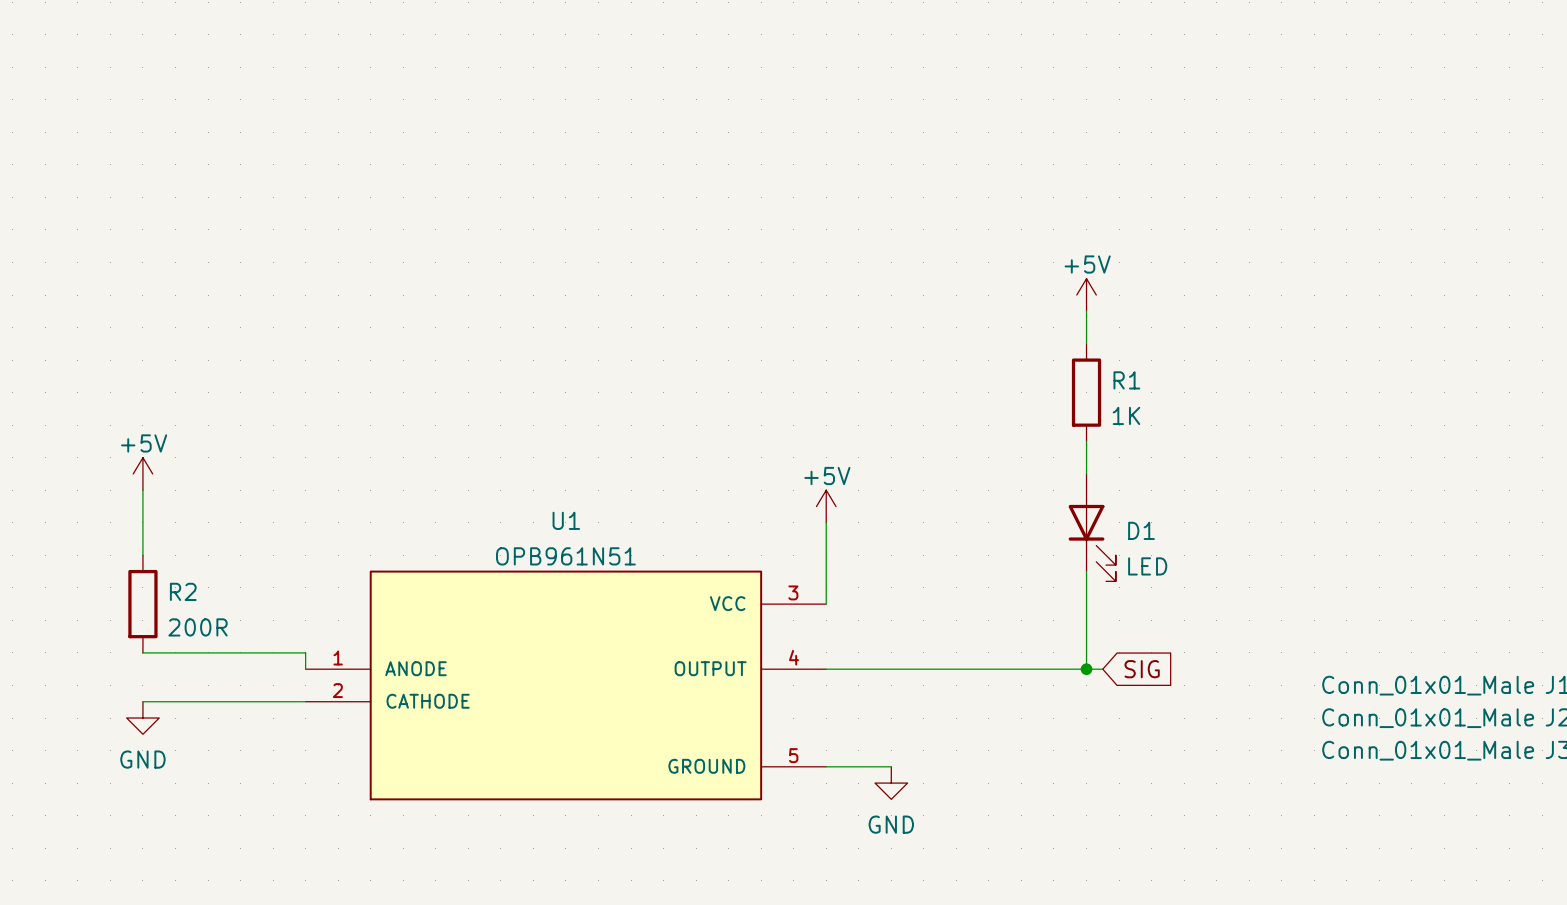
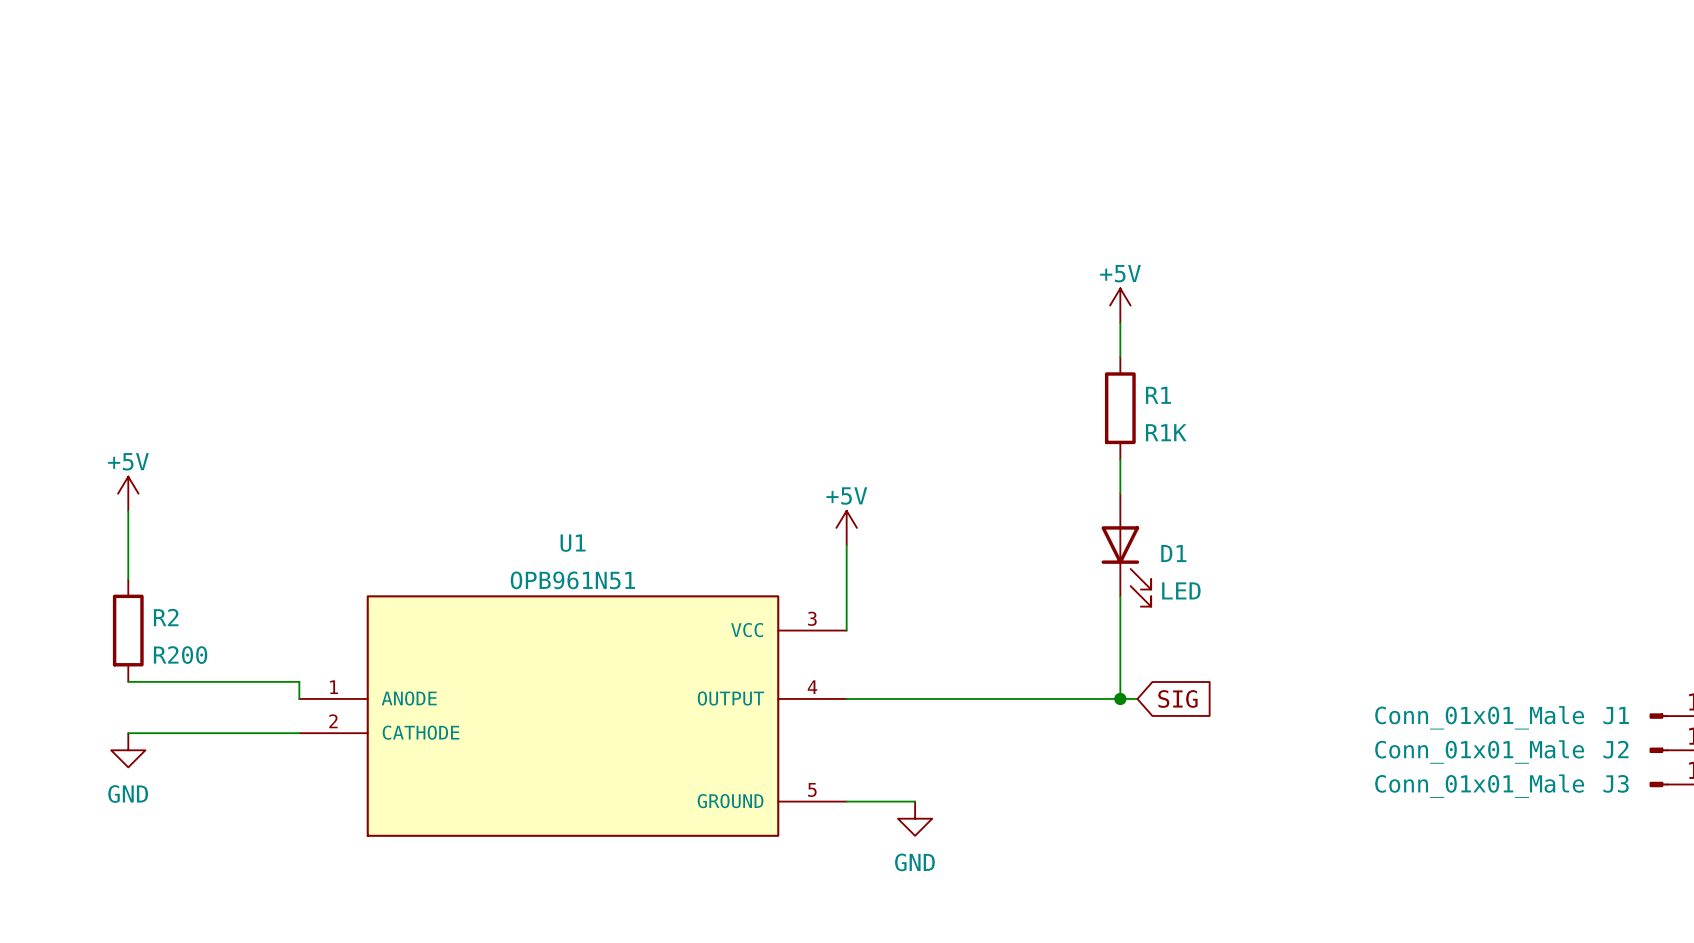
R1 value: 1K (1126, 415) -> R1K (1166, 432)
R2 value: 200R (198, 627) -> R200 (180, 655)

